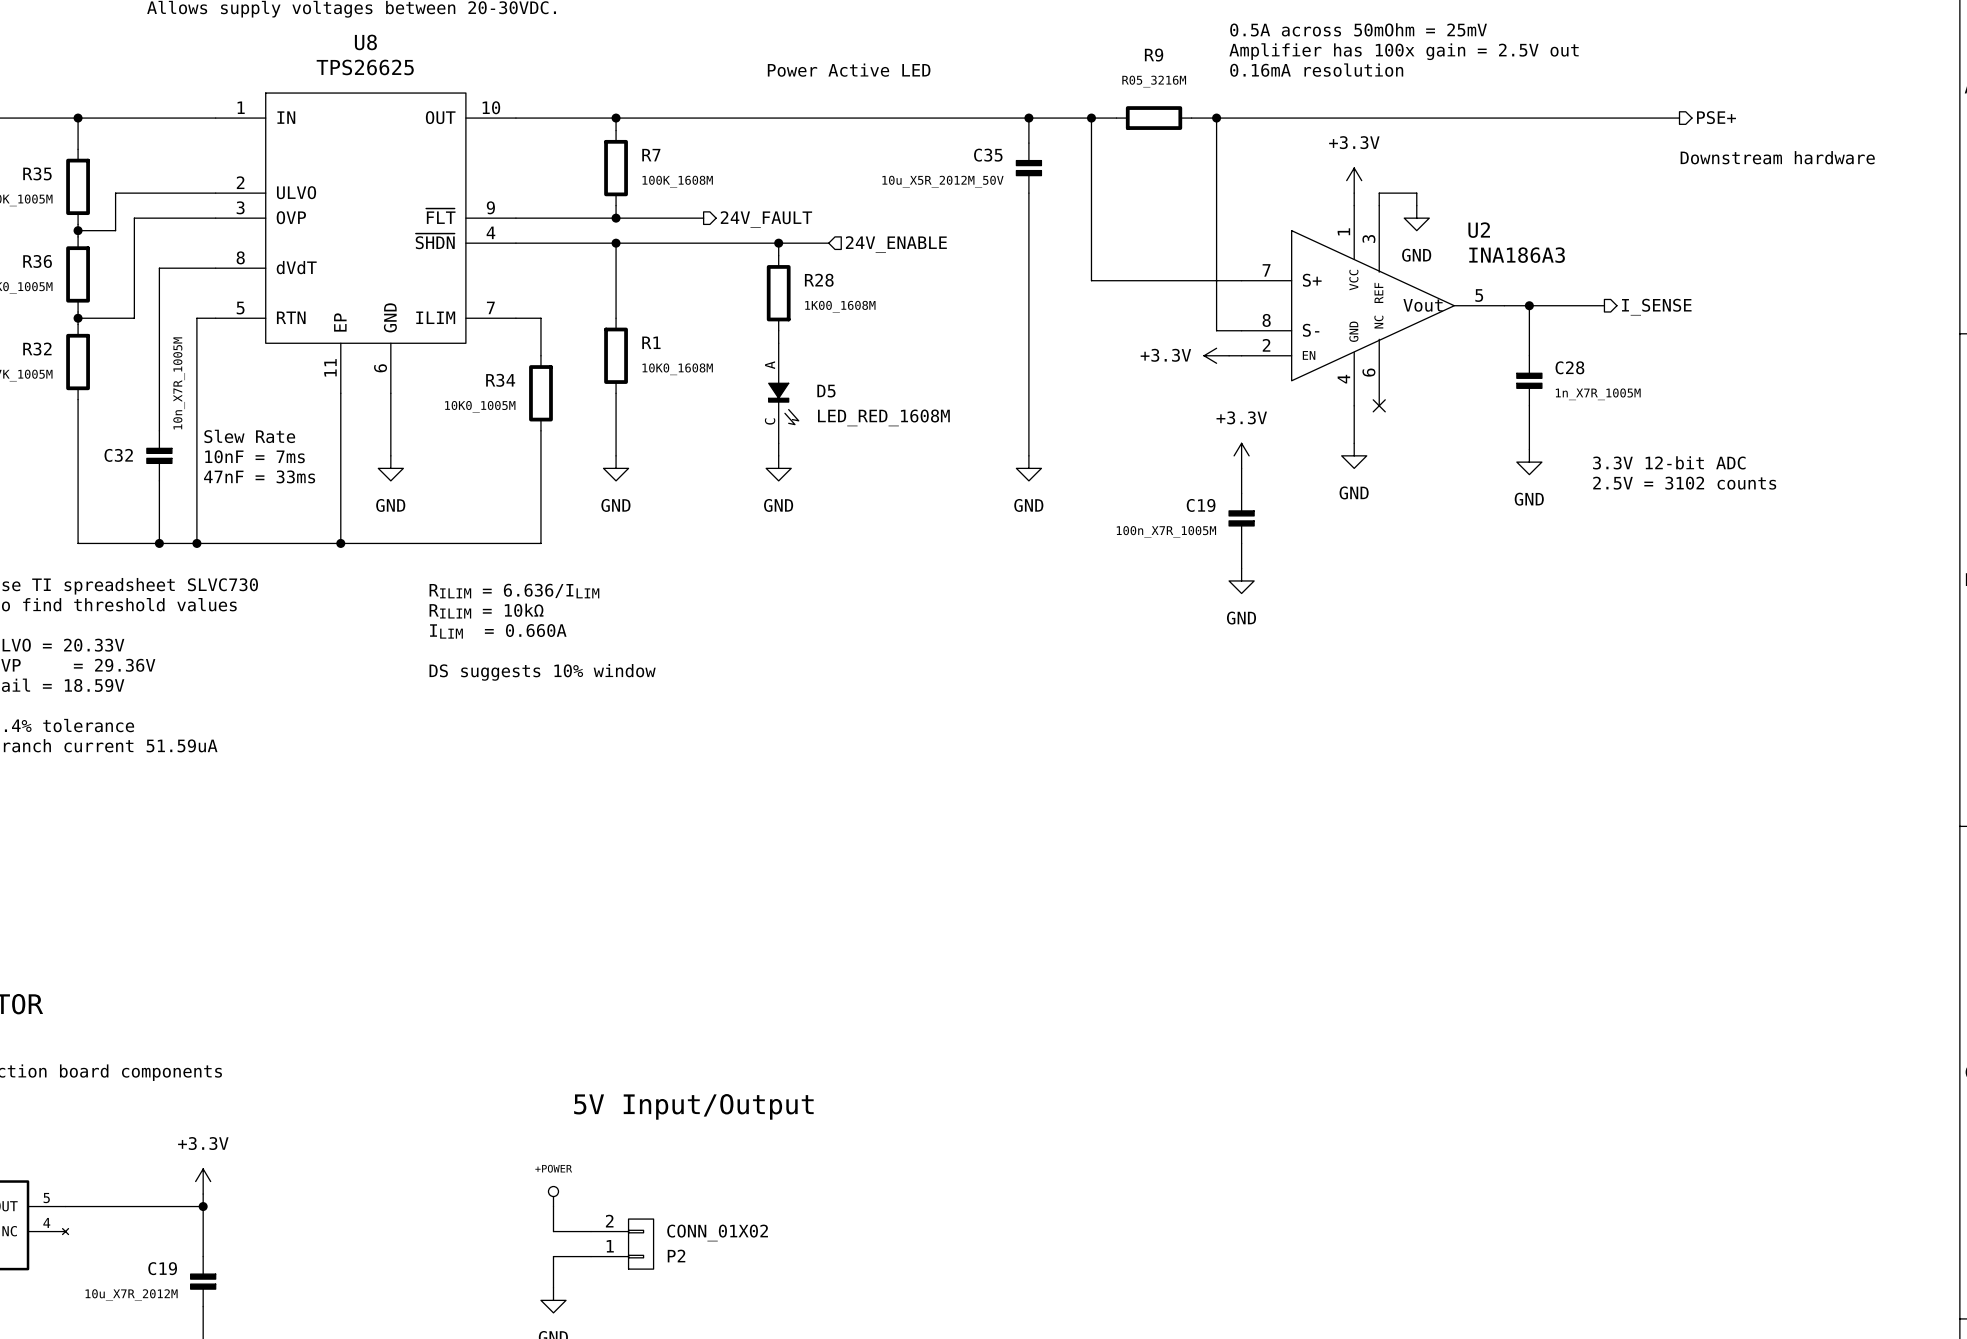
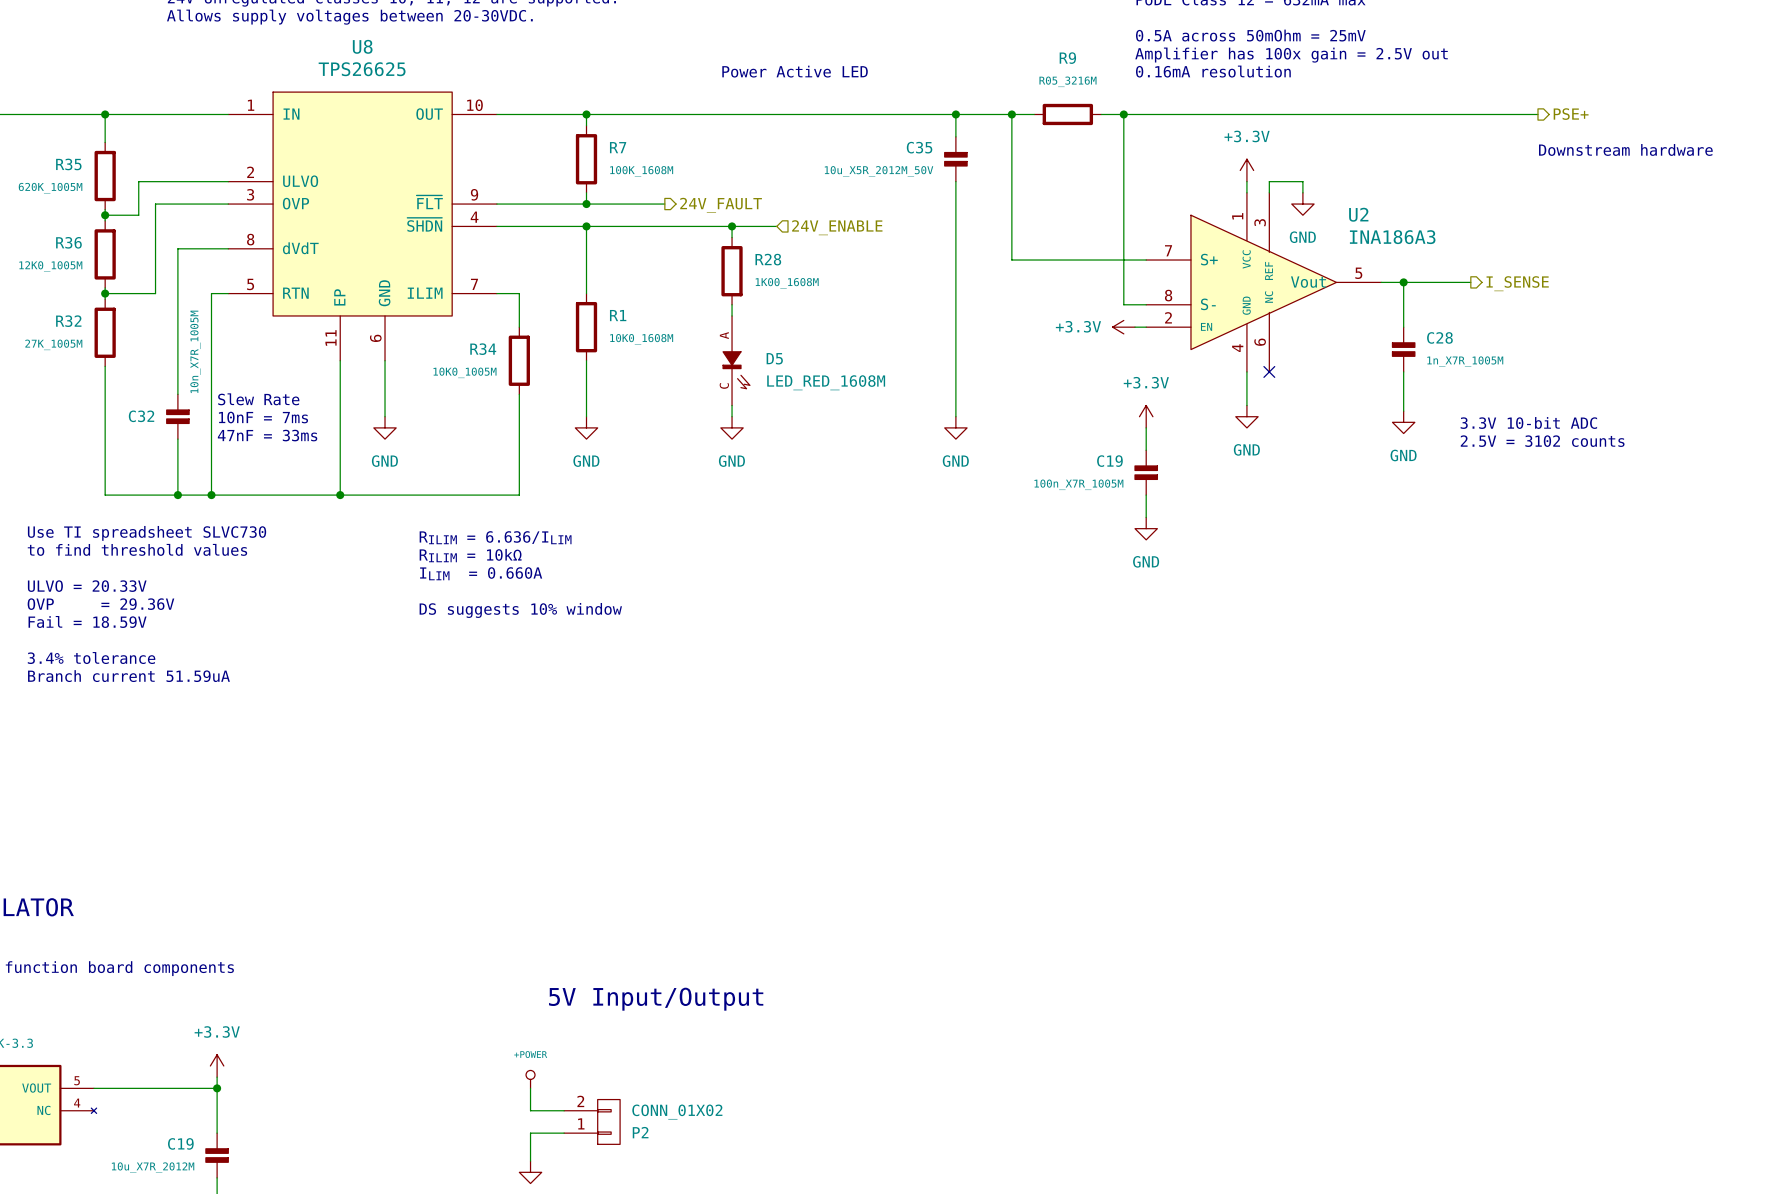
text: 3.3V 12-bit ADC (1669, 462) -> 3.3V 10-bit ADC (1528, 422)

